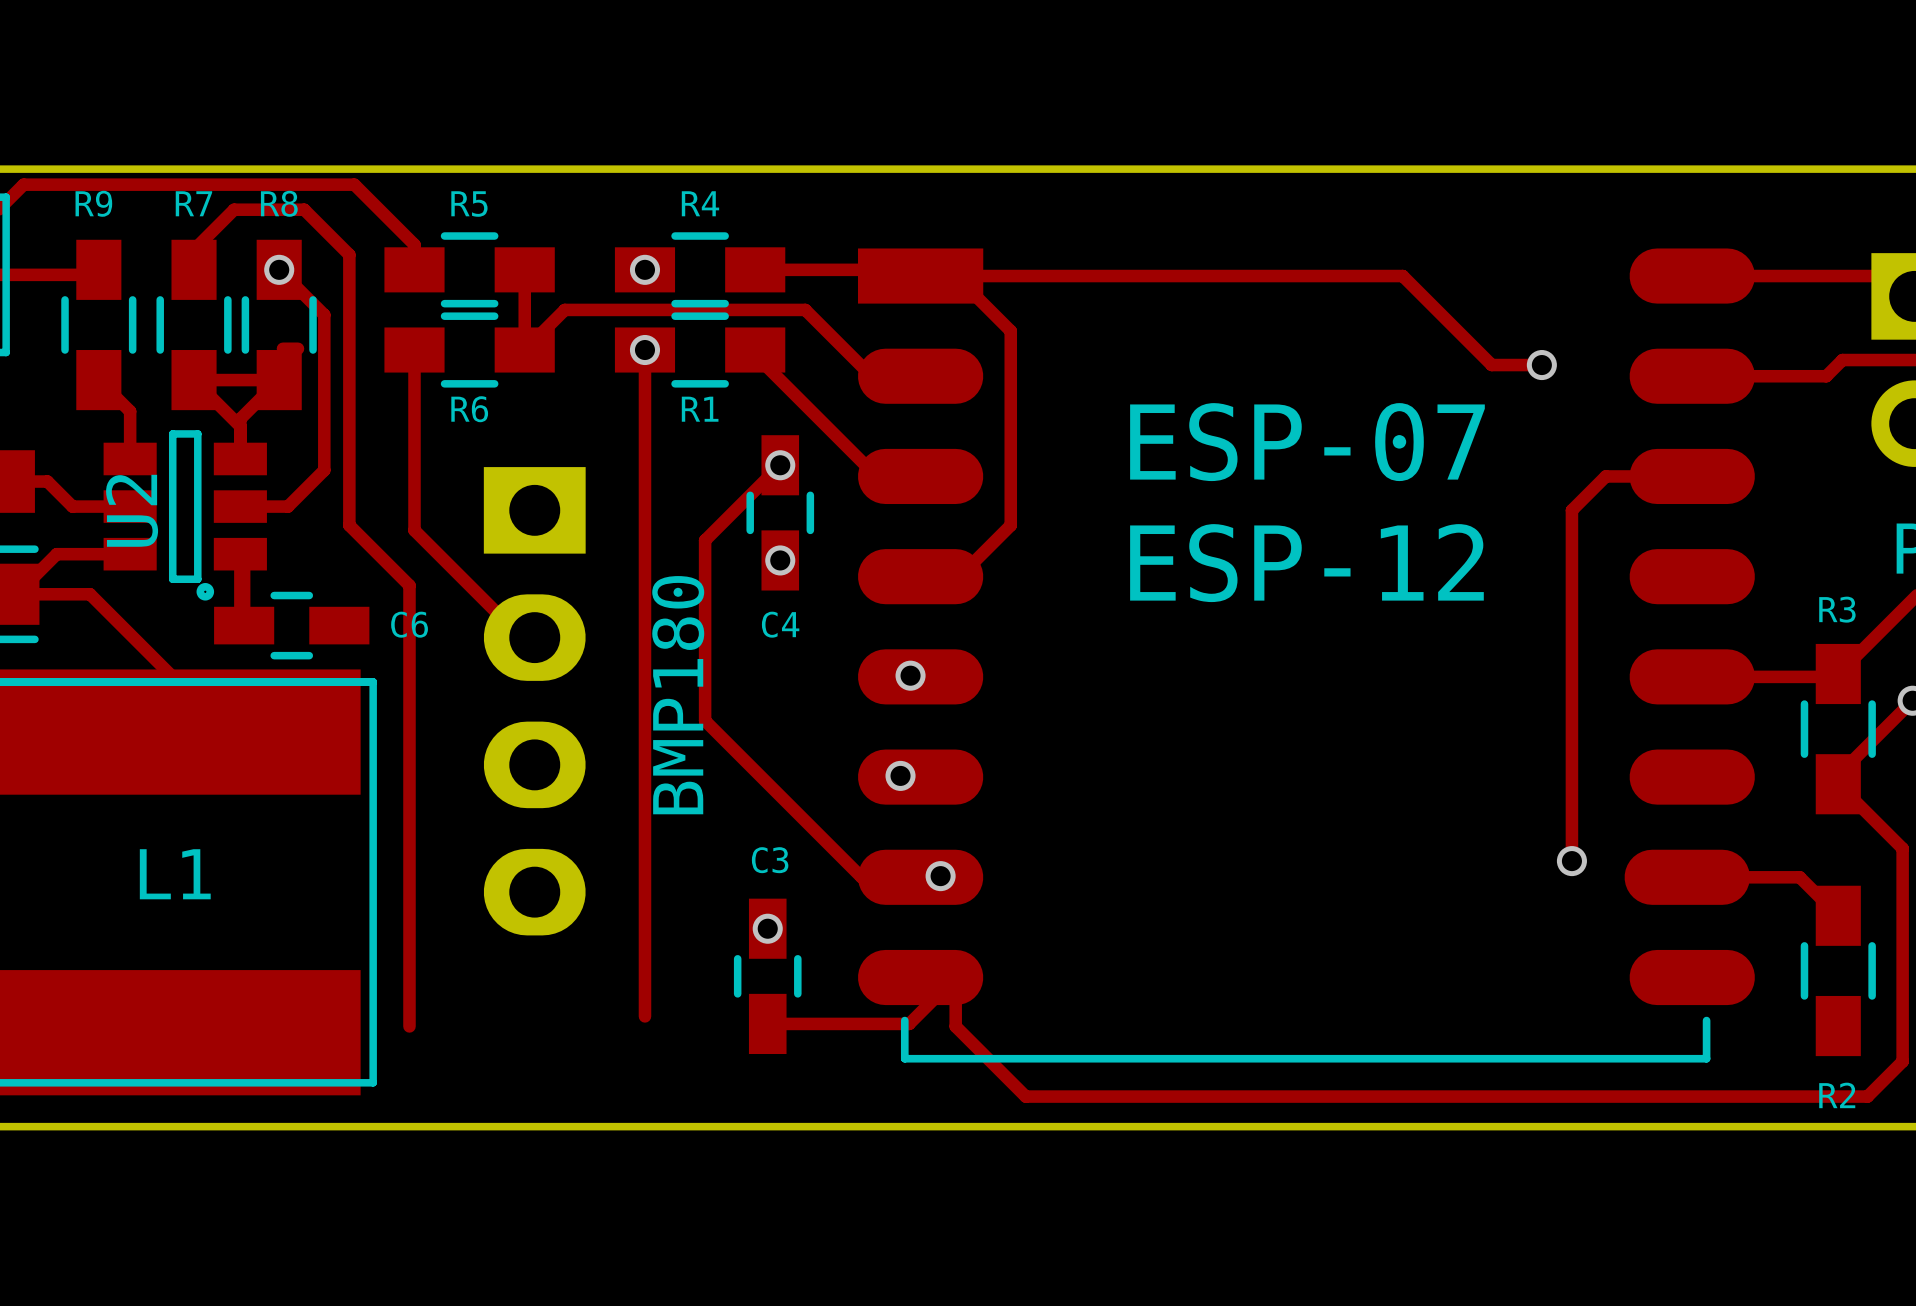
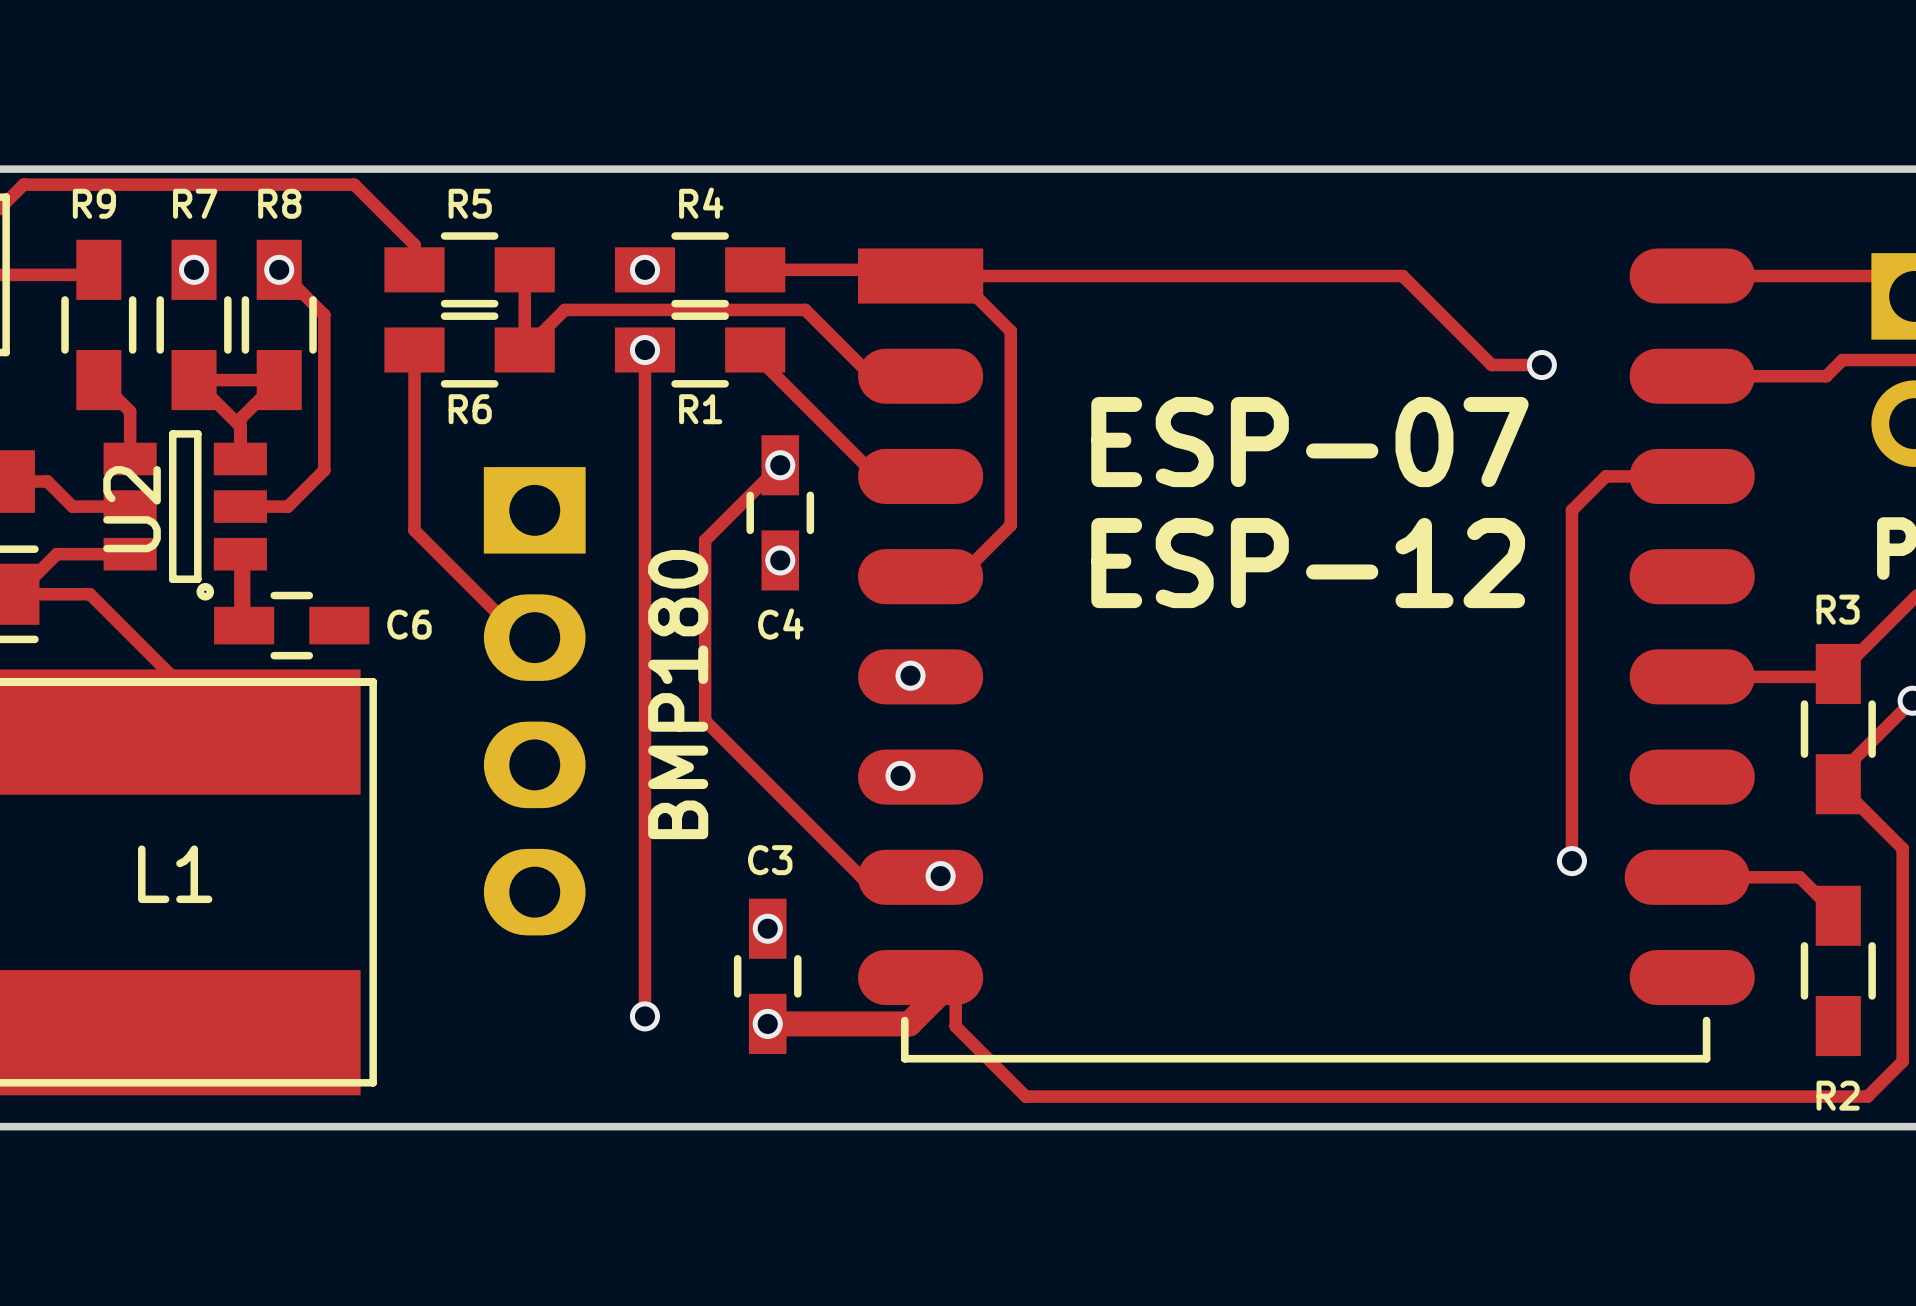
track: (194, 249) (234, 209) (304, 209) (349, 254) (349, 525) (409, 585) (409, 1026) -> none
via: none -> (194, 269)
track: (282, 348) (298, 348) -> none
track width: thin (955, 977) (909, 1023) (767, 1023) -> thick (955, 977) (909, 1023) (767, 1023)
via: none -> (644, 1016)
via: none -> (767, 1023)

